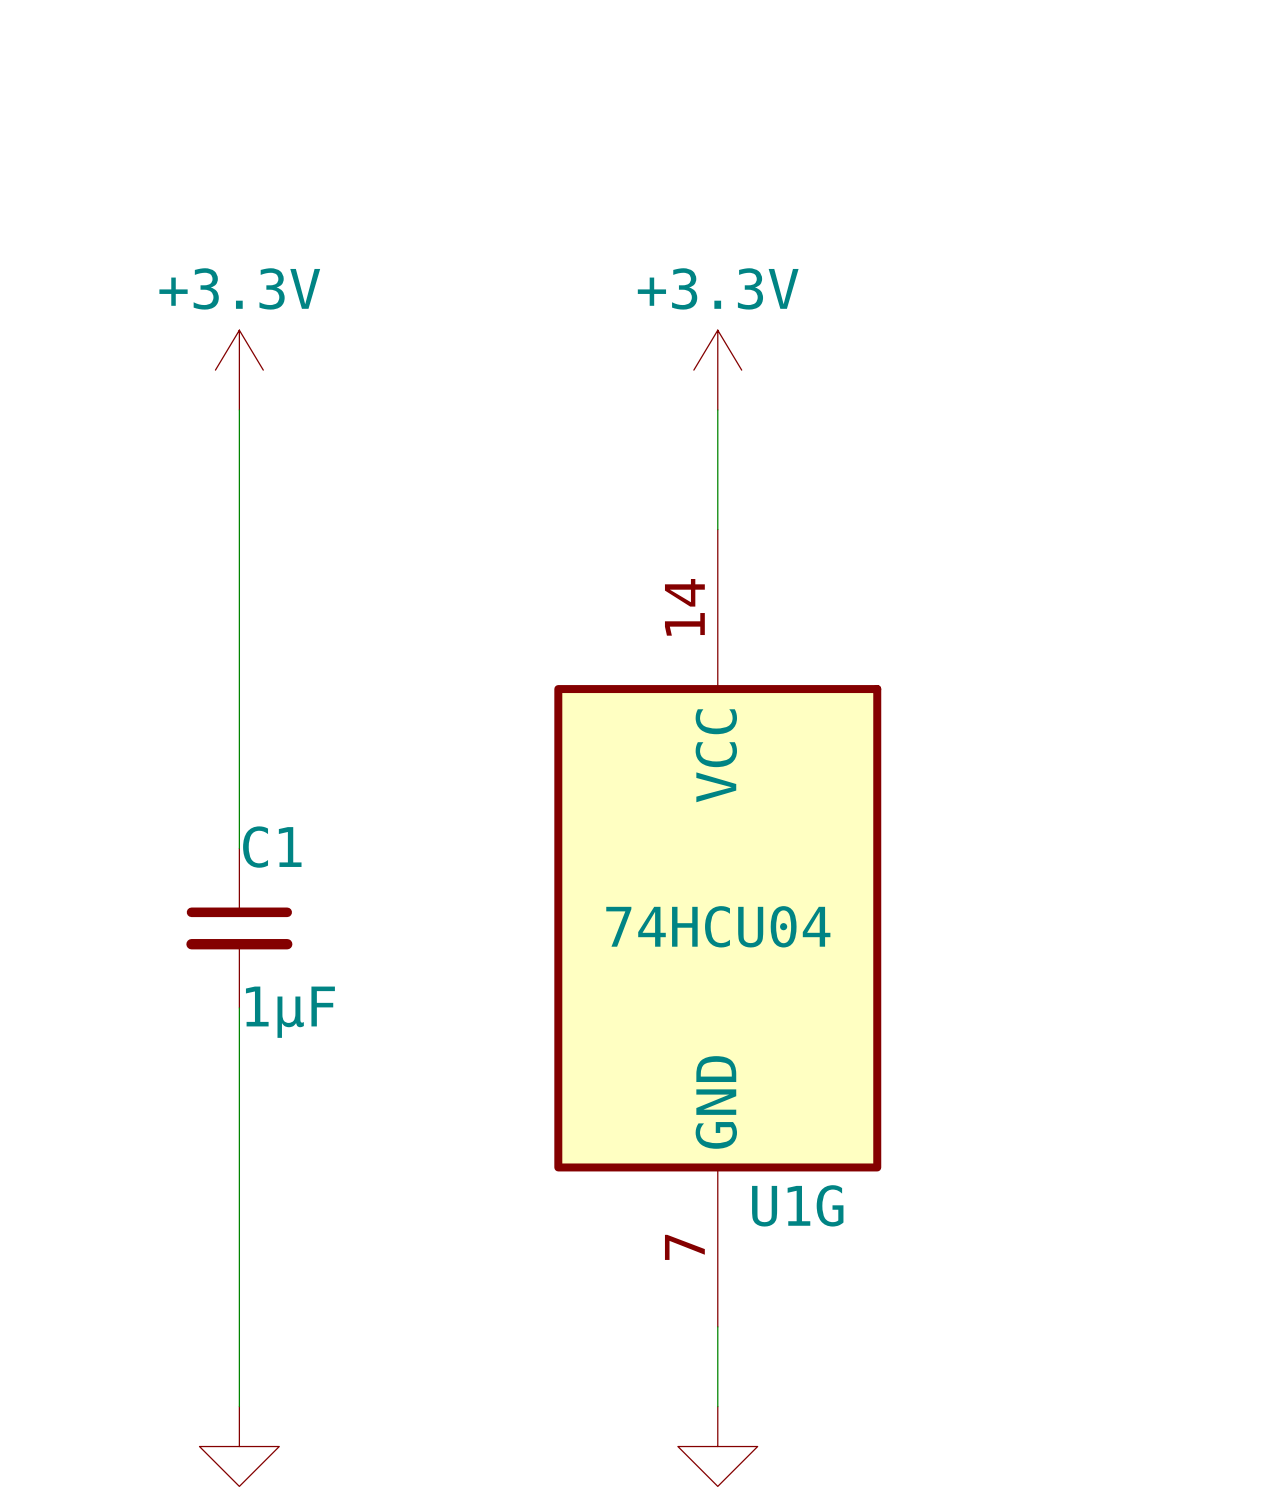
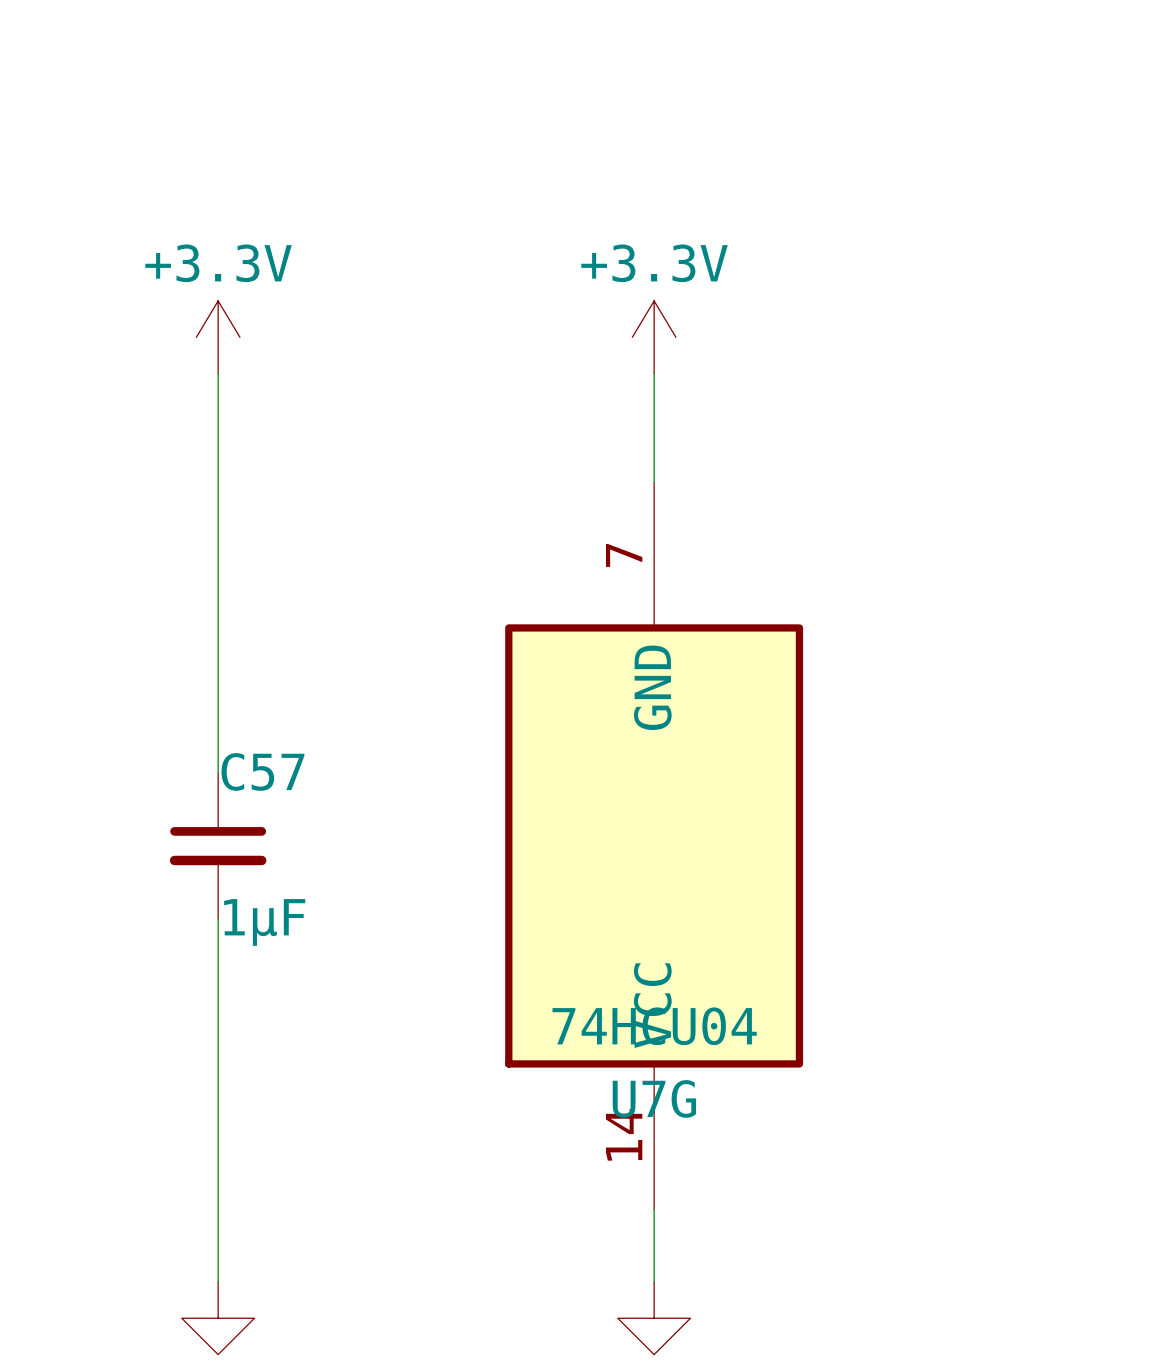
C1 name: C1 (272, 847) -> C57 (262, 771)
U1G value position: 74HCU04 (718, 926) -> 74HCU04 (654, 1026)
U1G rotation: 0° (717, 928) -> 180° (654, 845)
U1G name: U1G (797, 1205) -> U7G (654, 1098)

